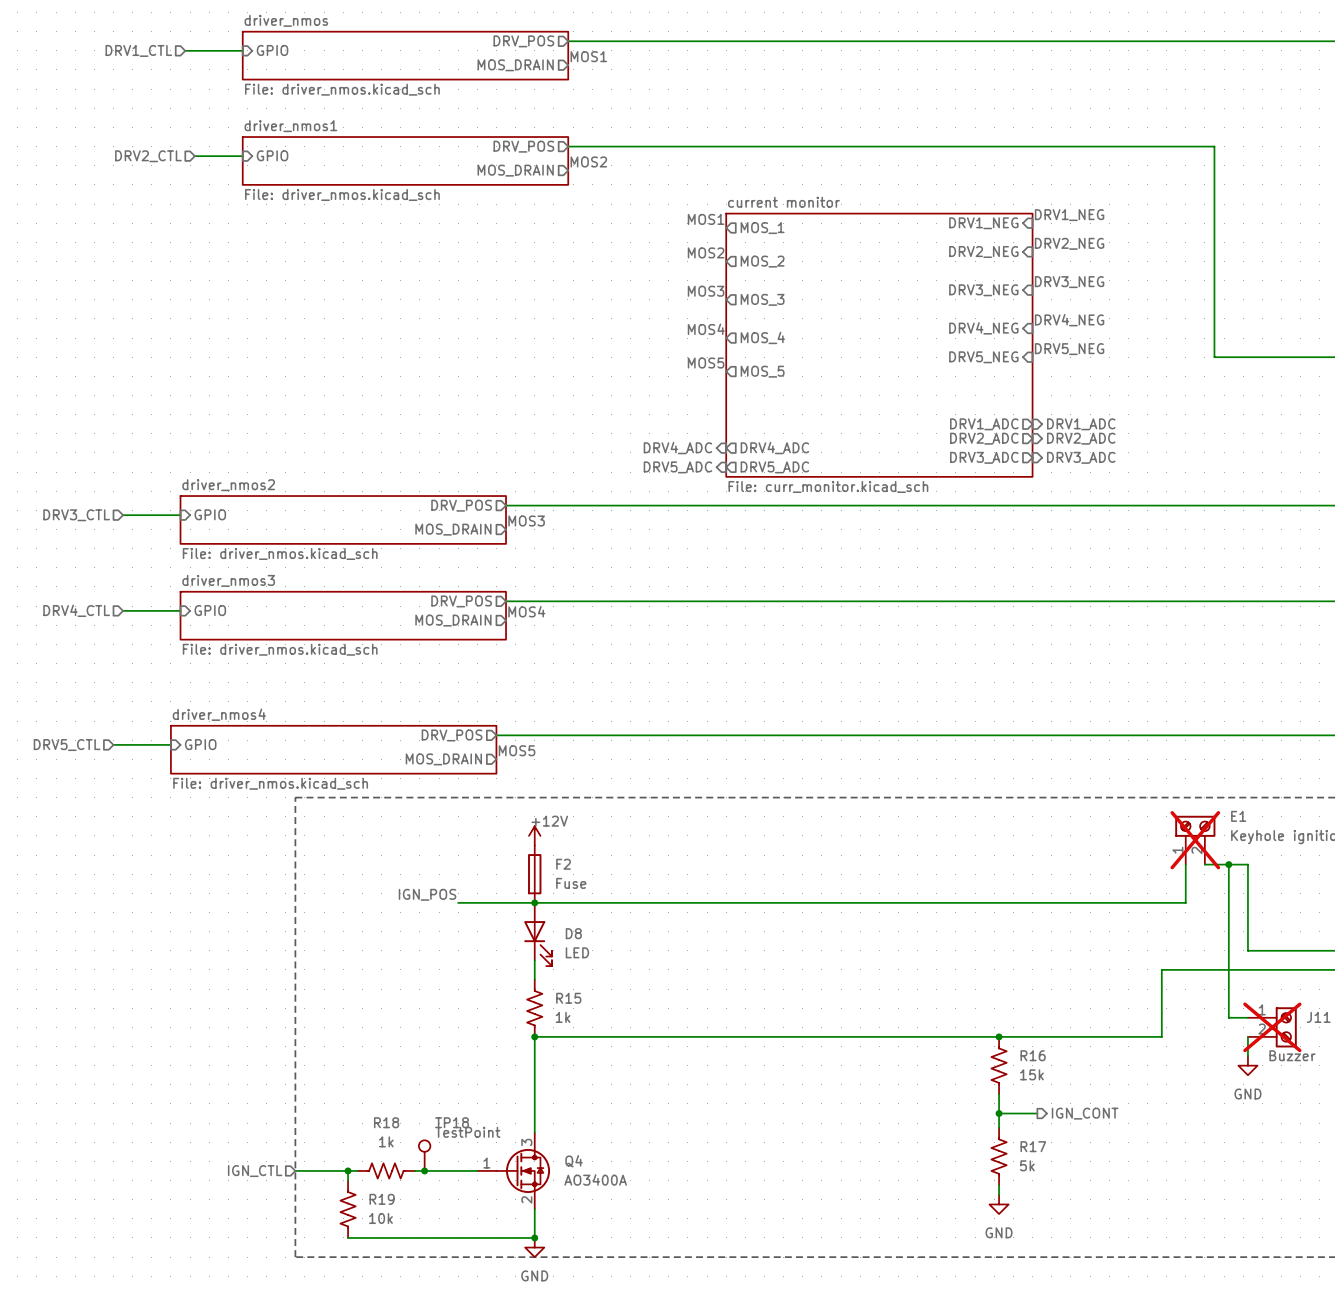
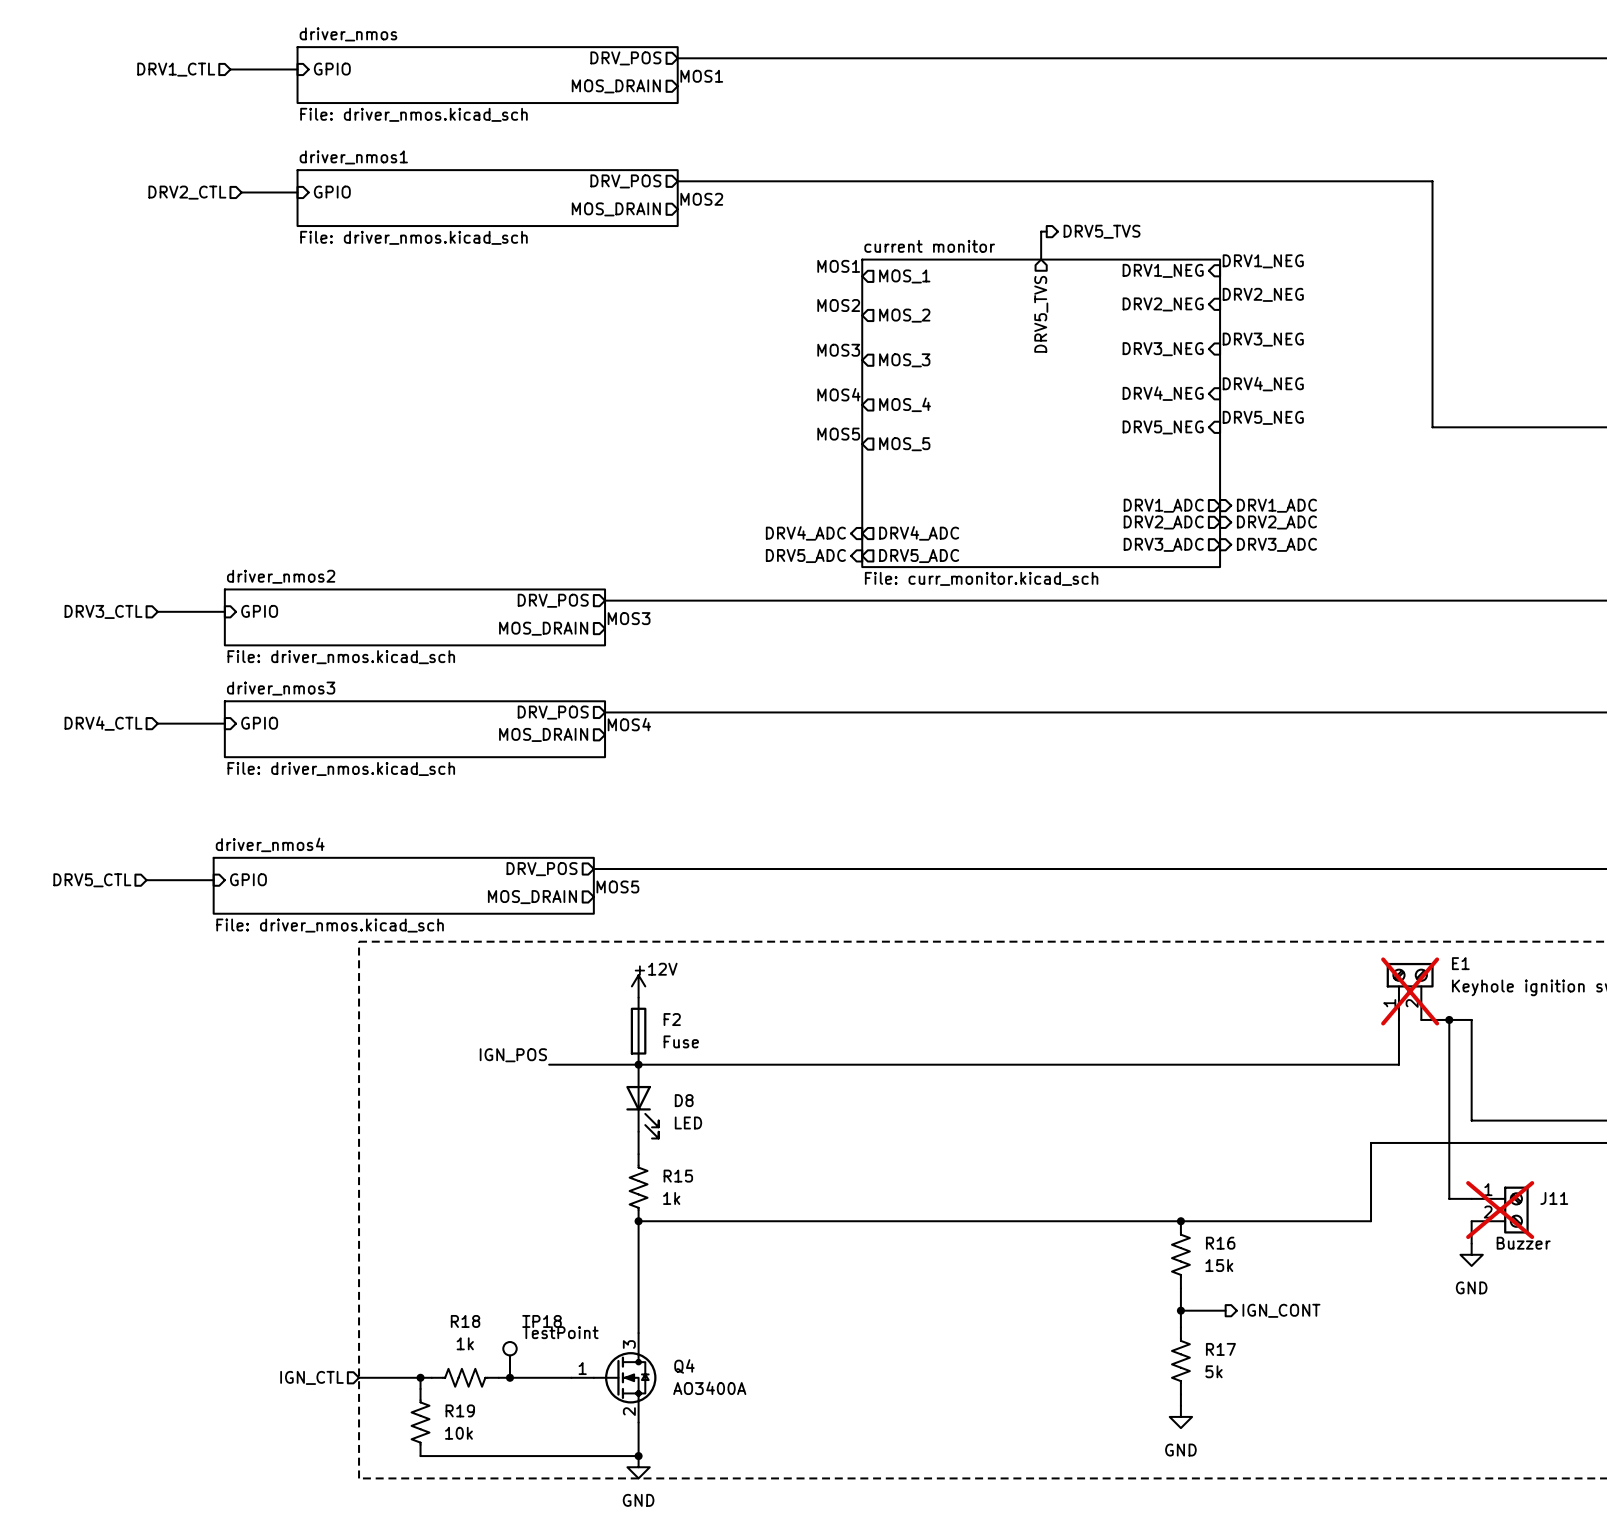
wire: none -> (1046, 231) (1041, 231) (1041, 259)
hierarchical label: none -> DRV5_TVS (1102, 231)
sheet pin: none -> DRV5_TVS (1041, 314)

